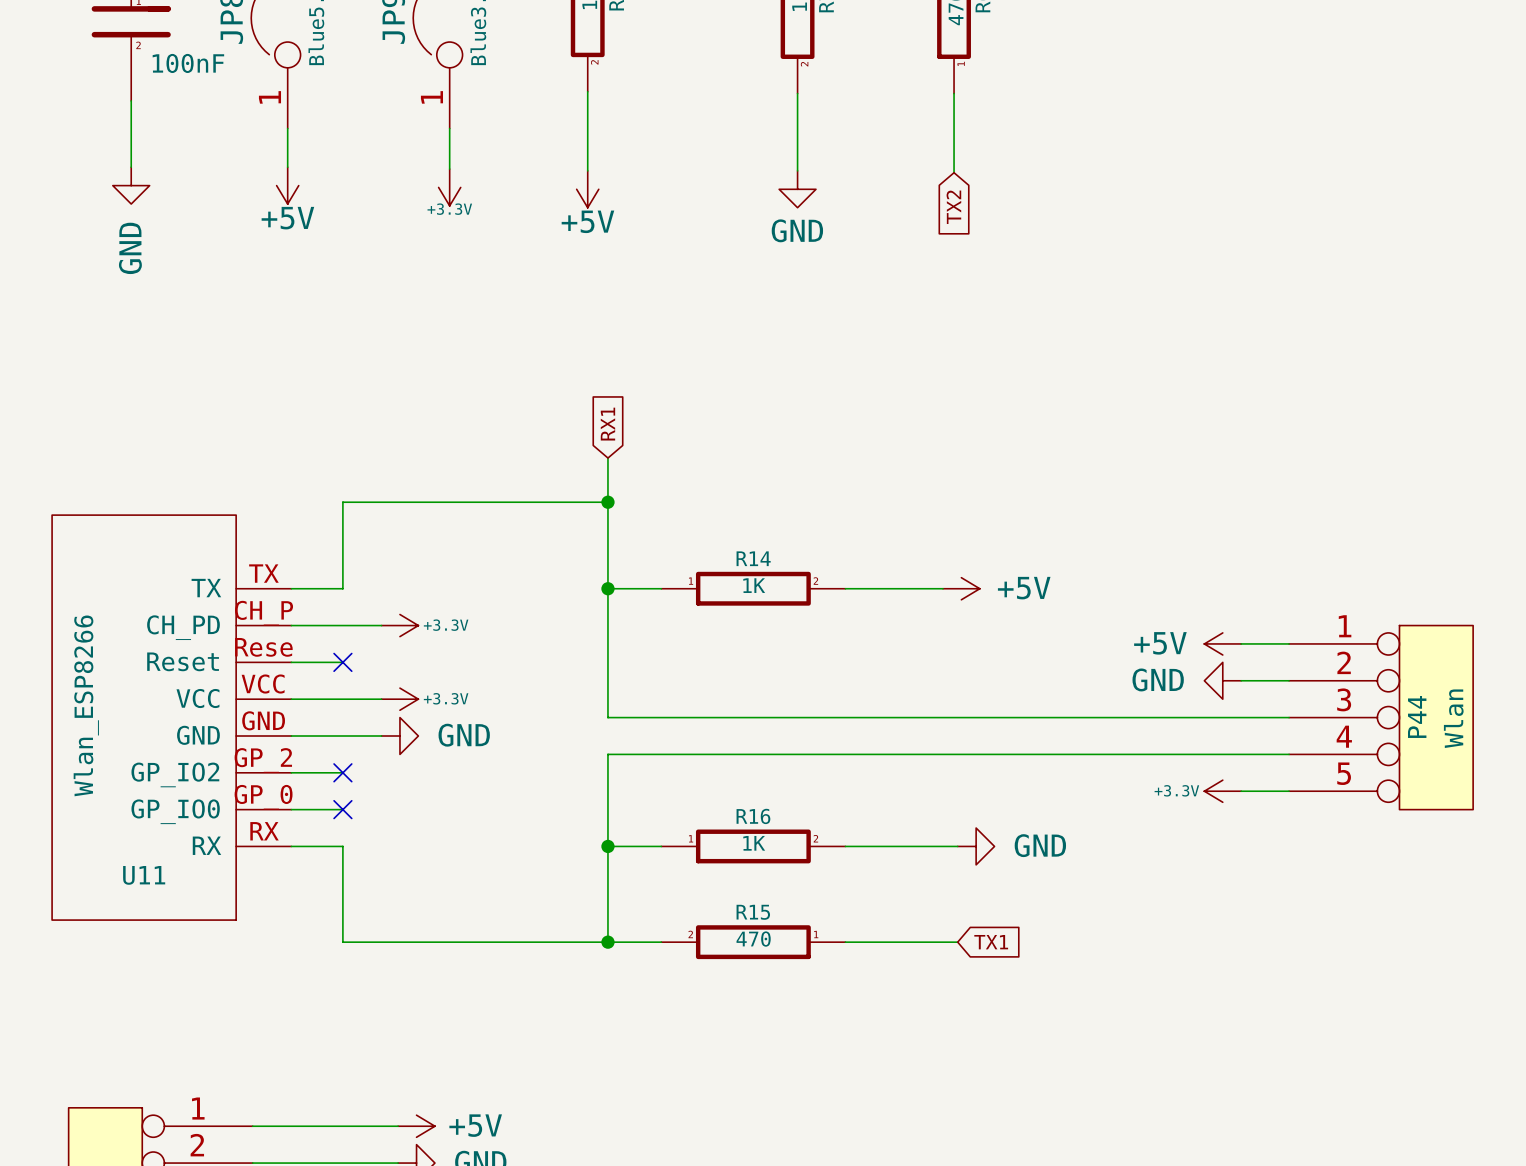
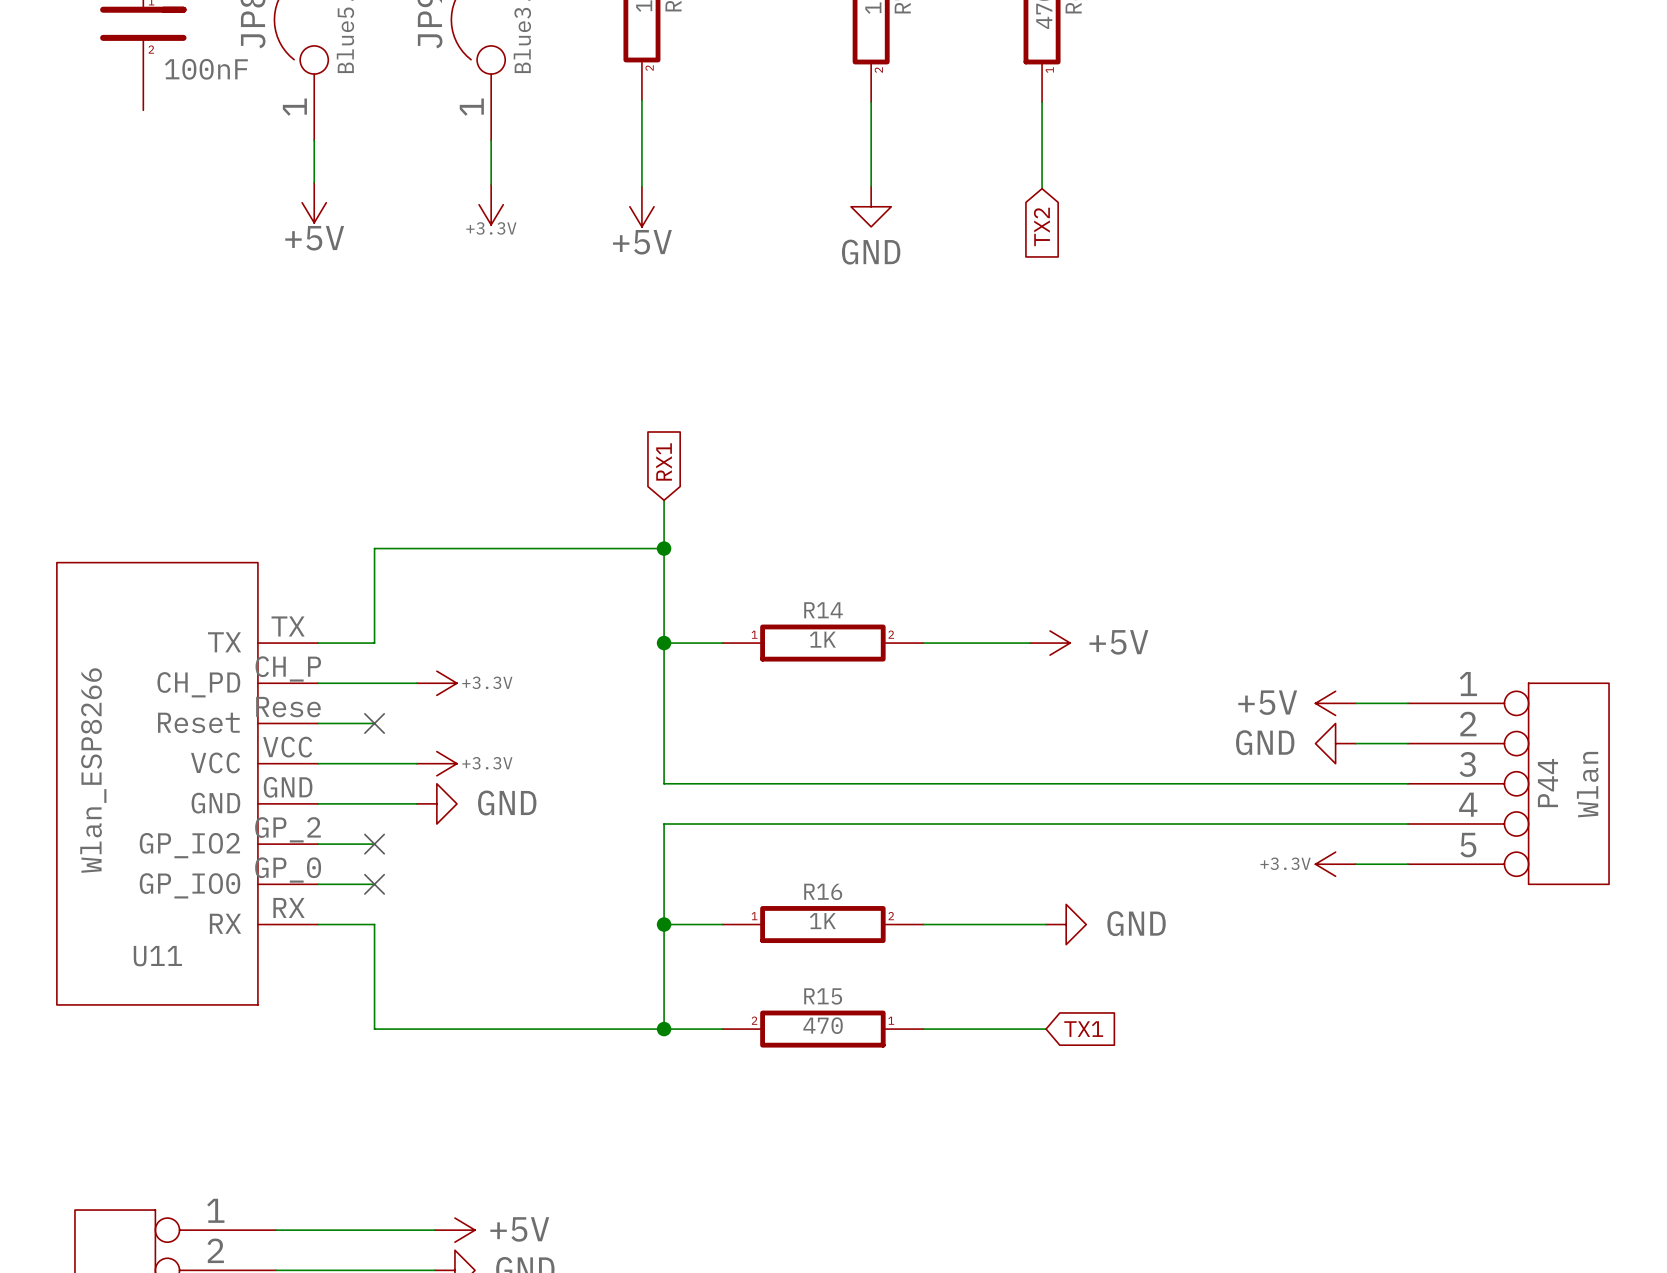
wire: (131, 100) (131, 167) -> none
power symbol: GND (131, 185) -> none

